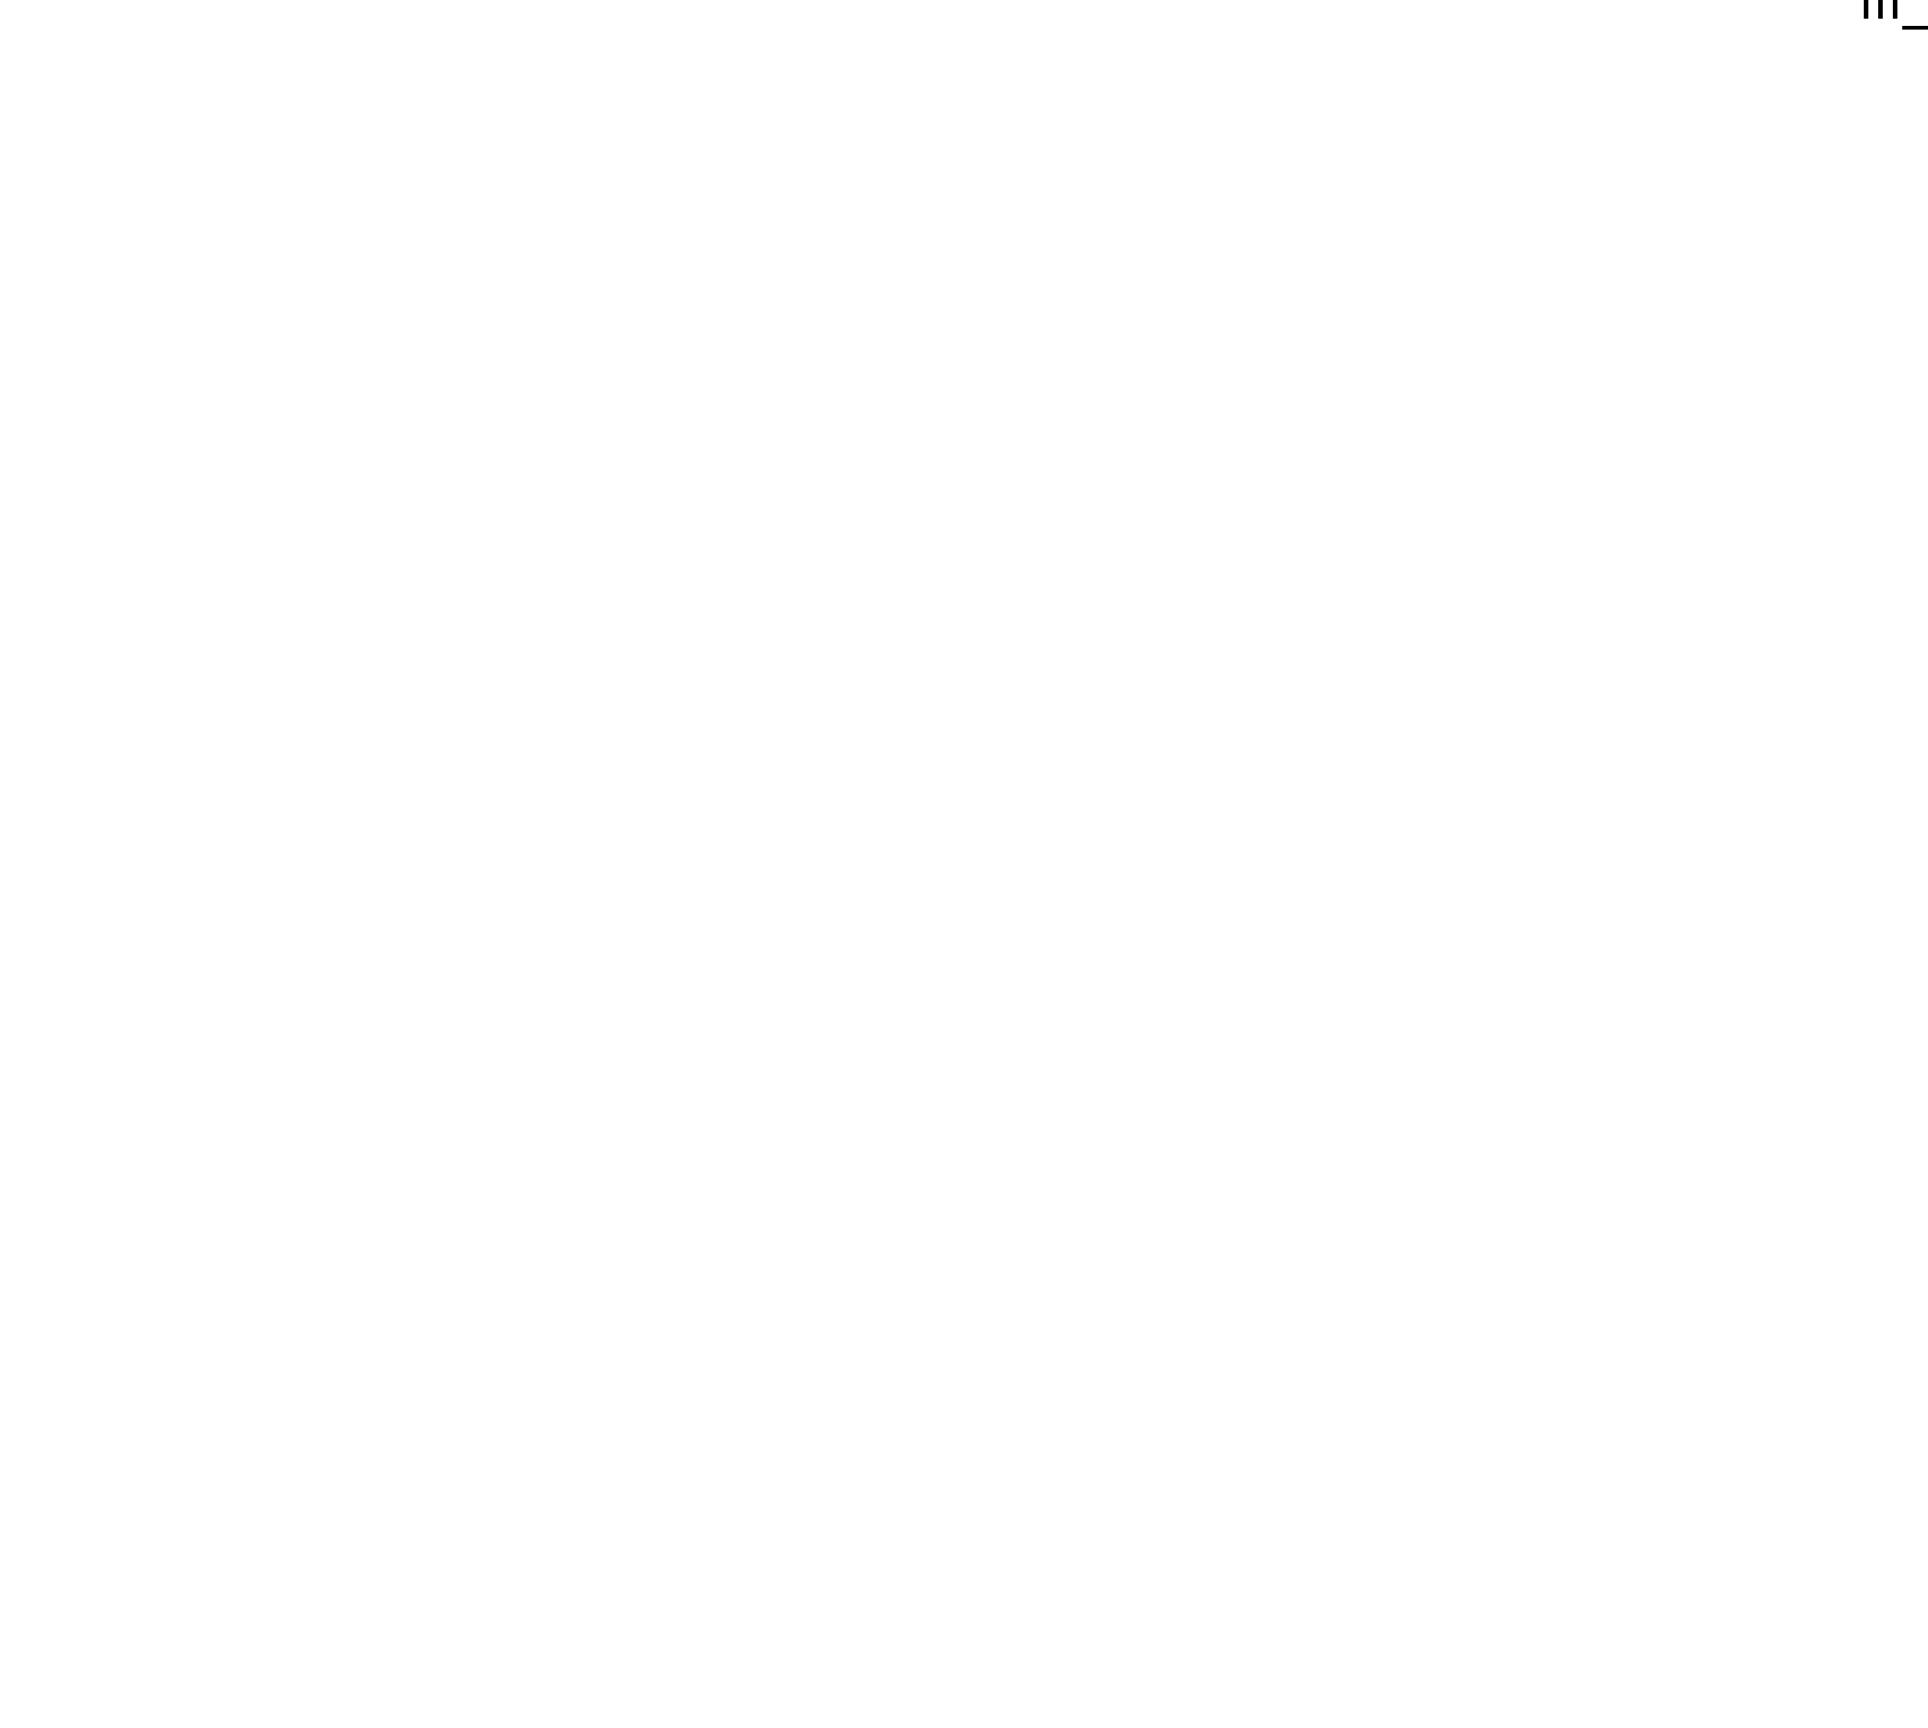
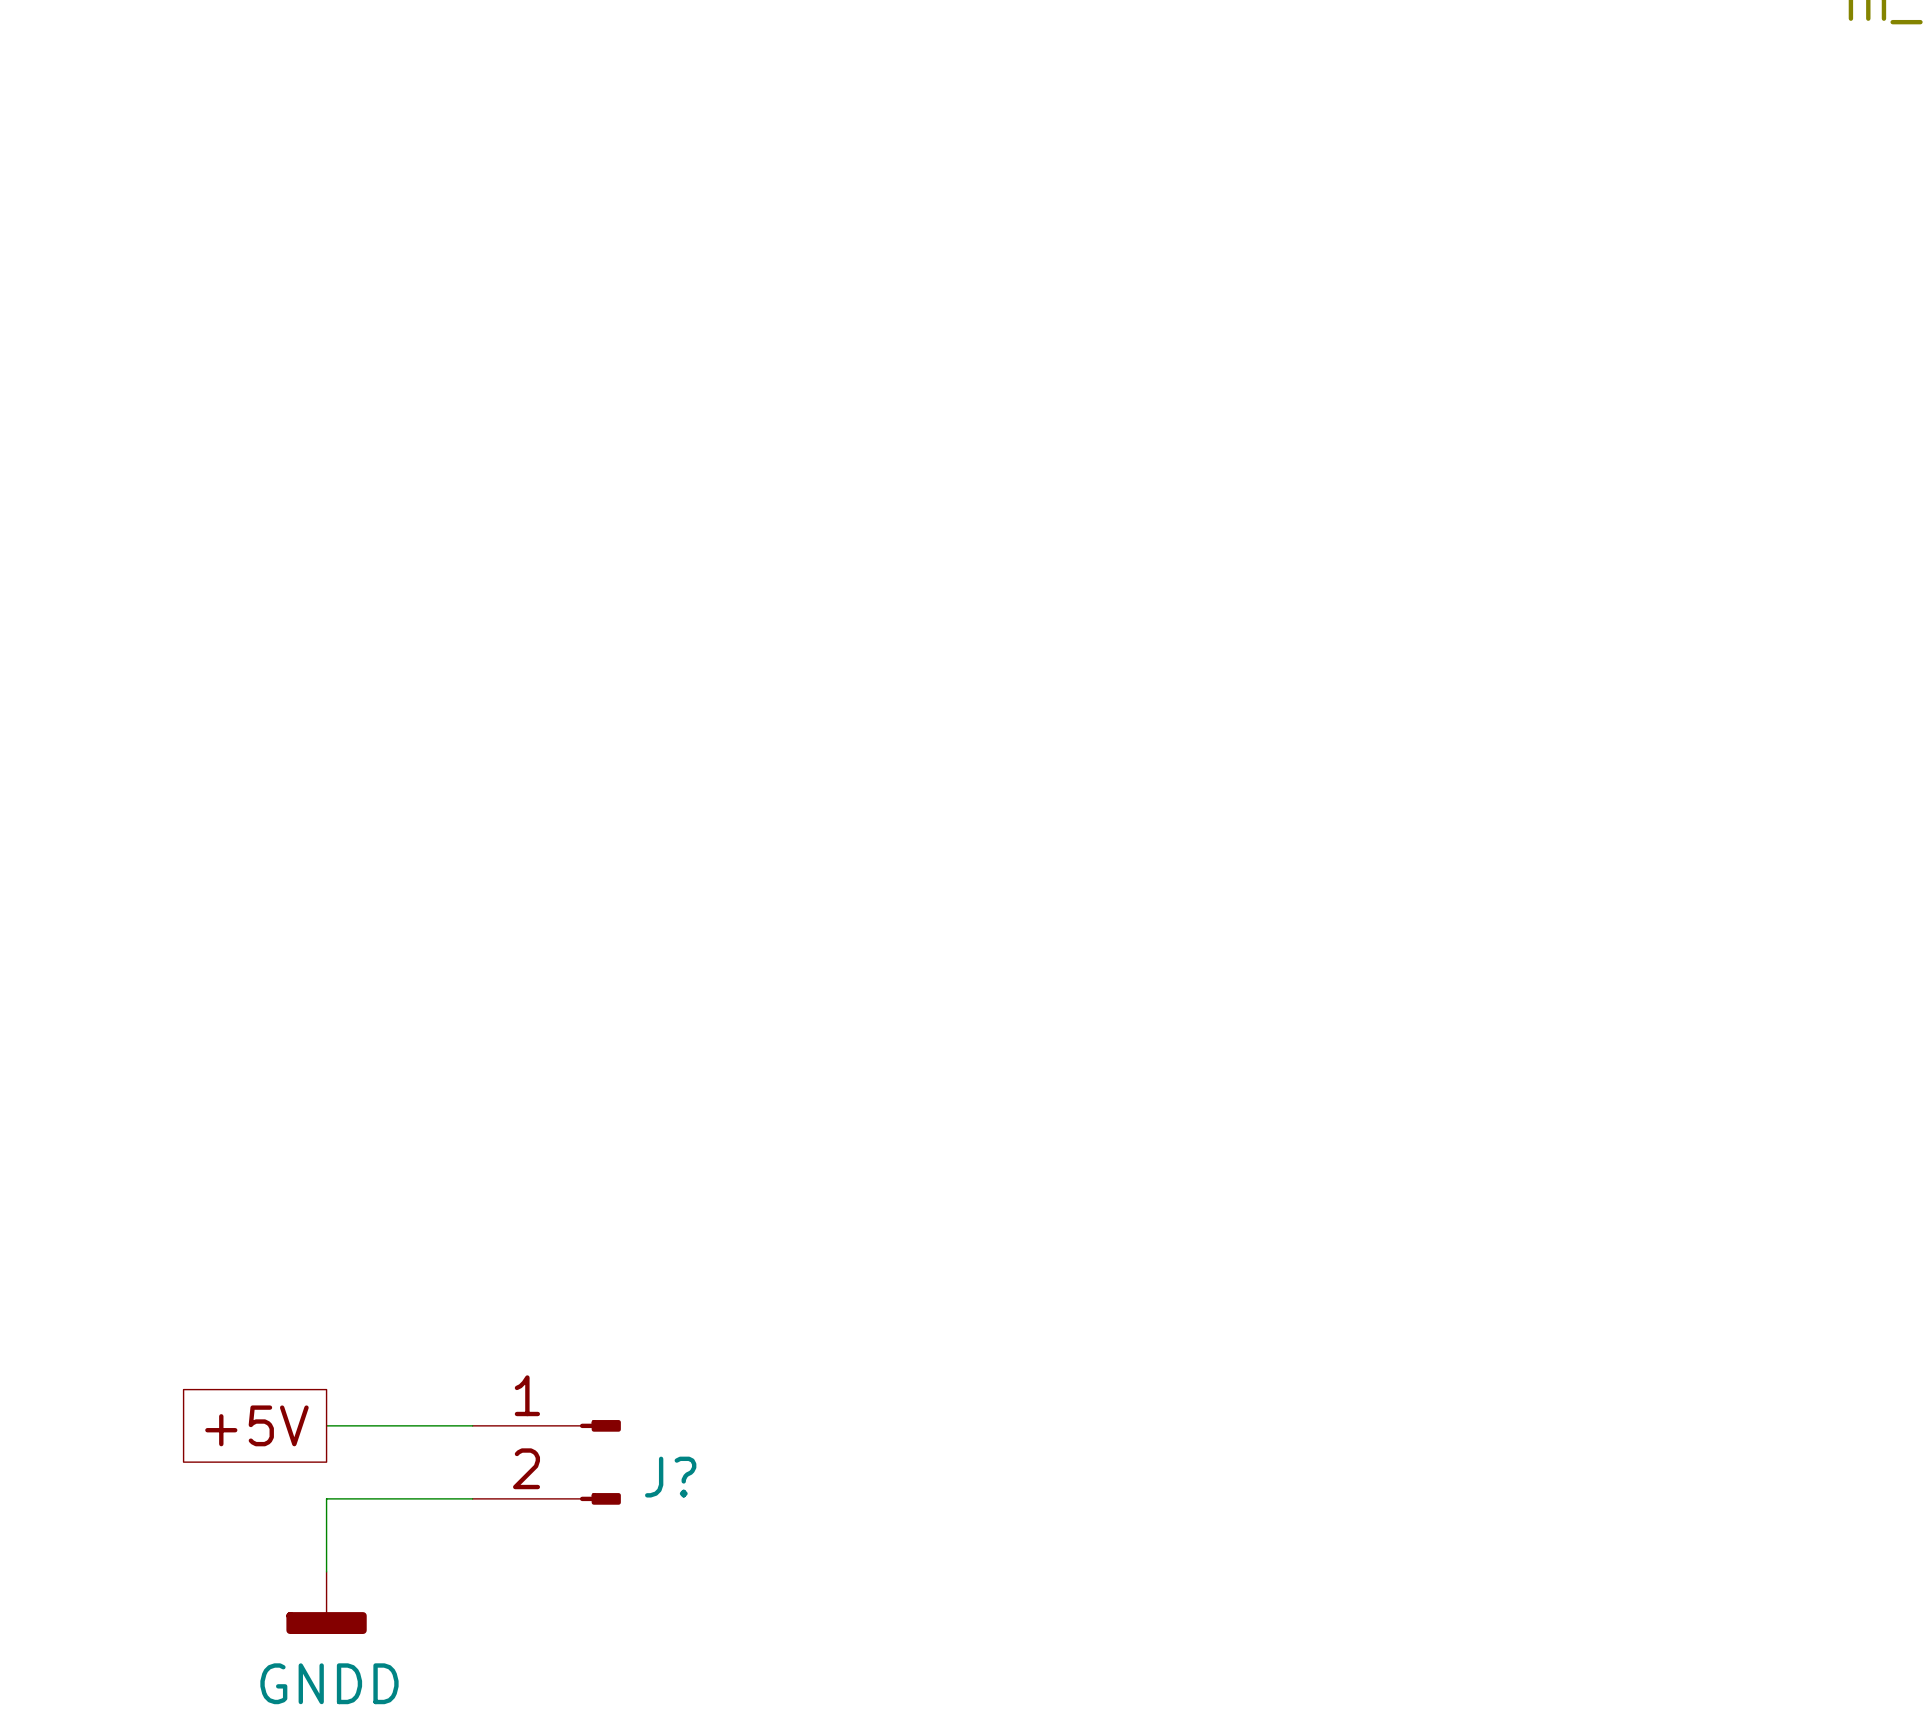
wire: none -> (326, 1425) (472, 1425)
global label: none -> +5V (256, 1425)
J?: none -> (546, 1462)
wire: none -> (472, 1498) (326, 1498) (326, 1571)
power symbol: none -> GNDD (326, 1602)

